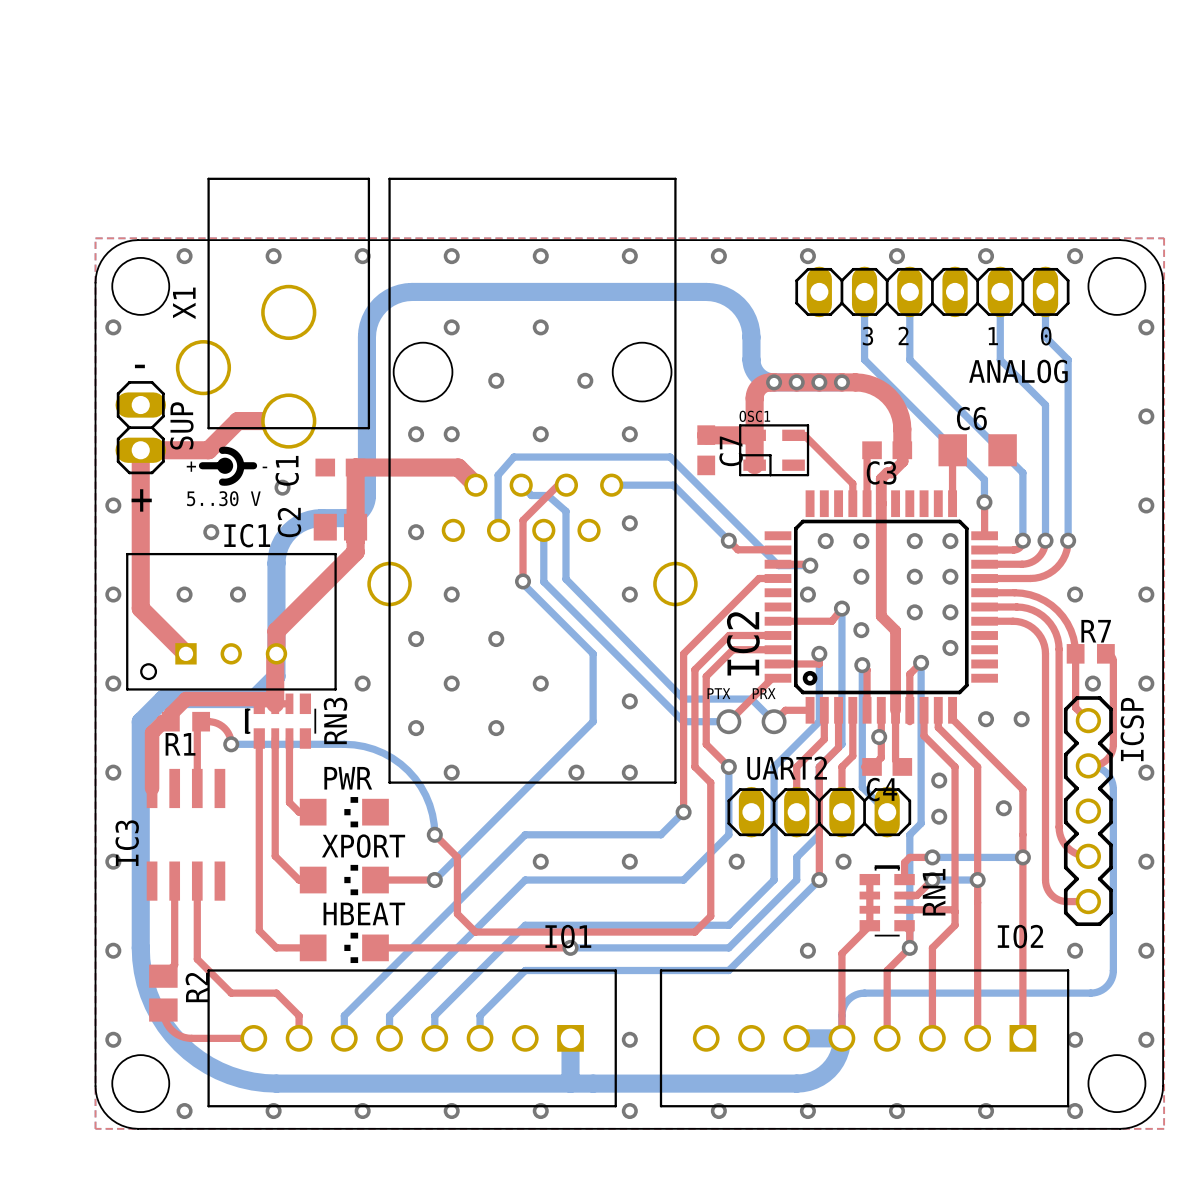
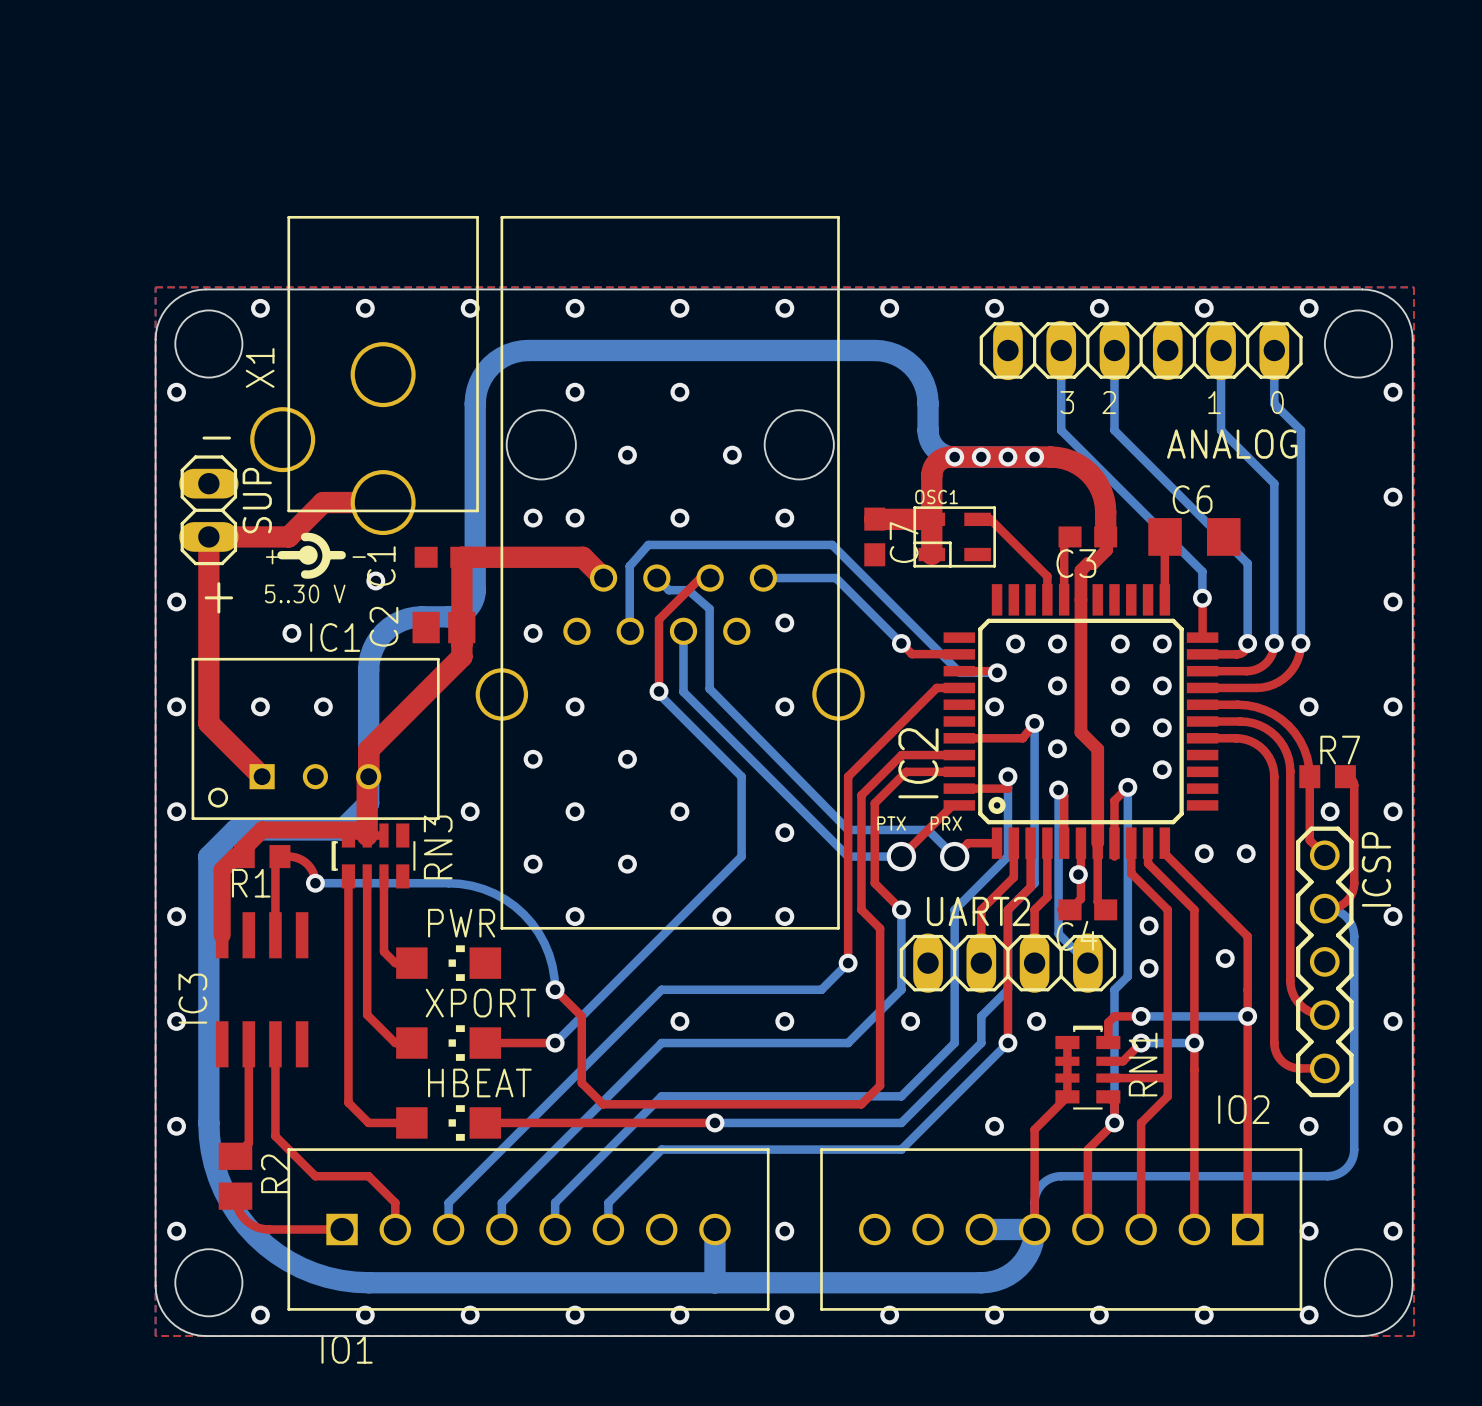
IO1 rotation: 0° (412, 1038) -> 180° (528, 1229)

